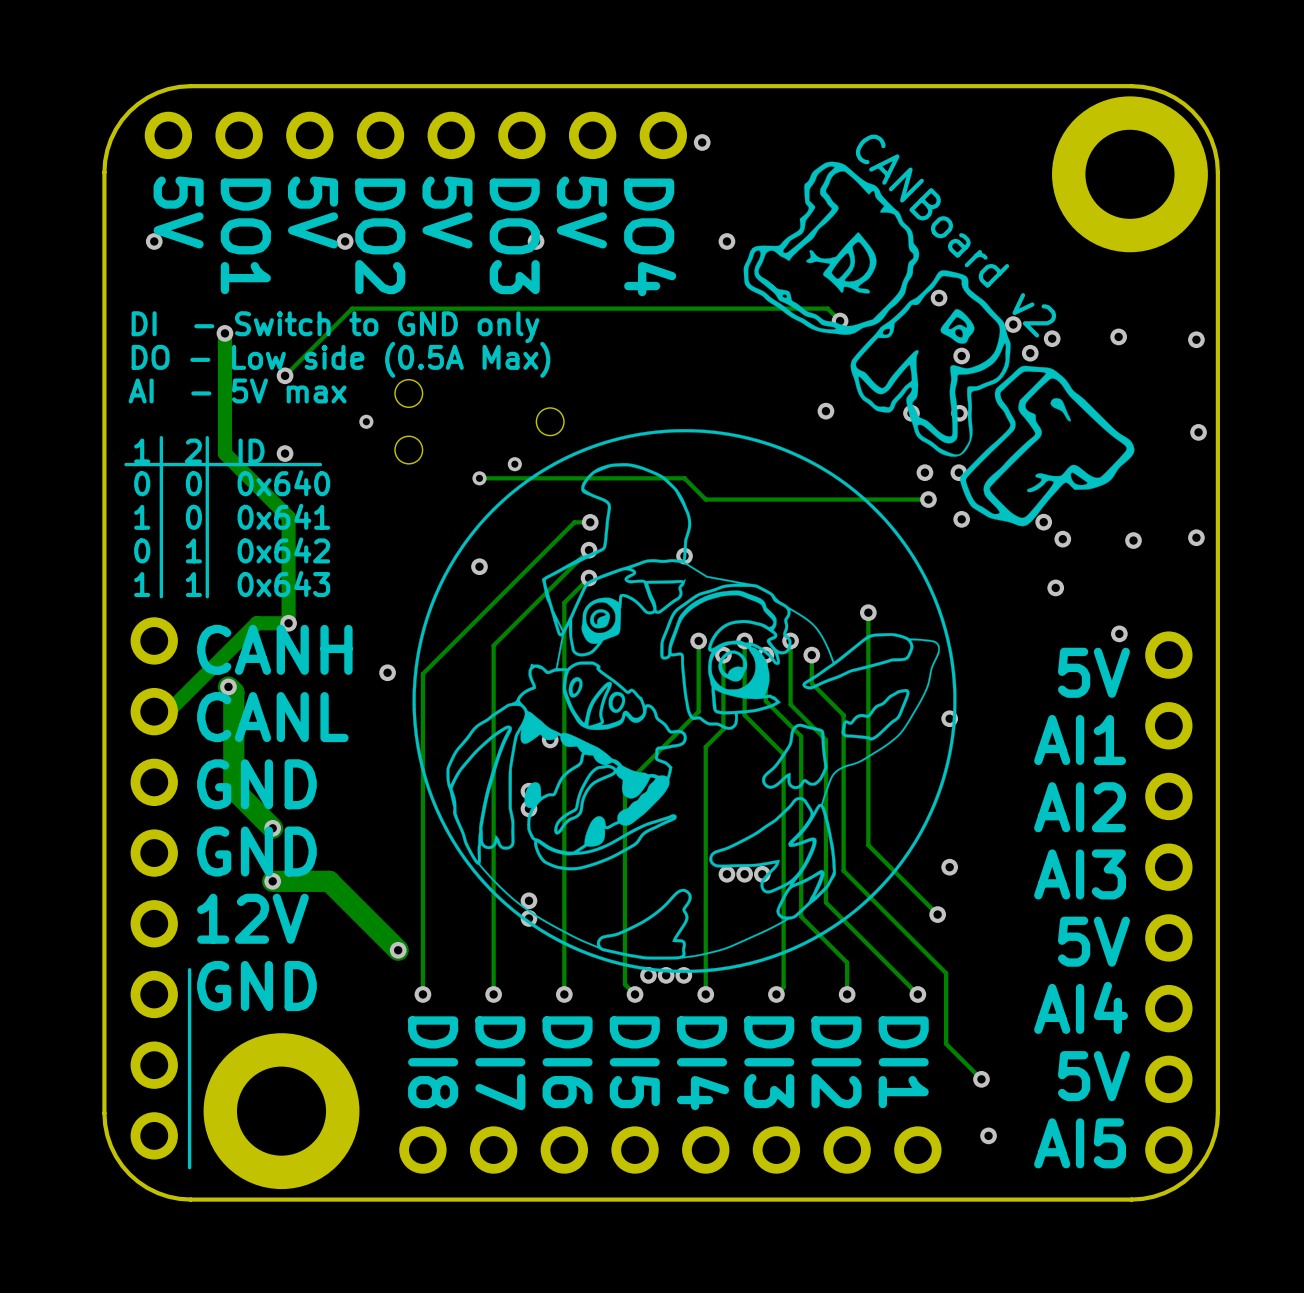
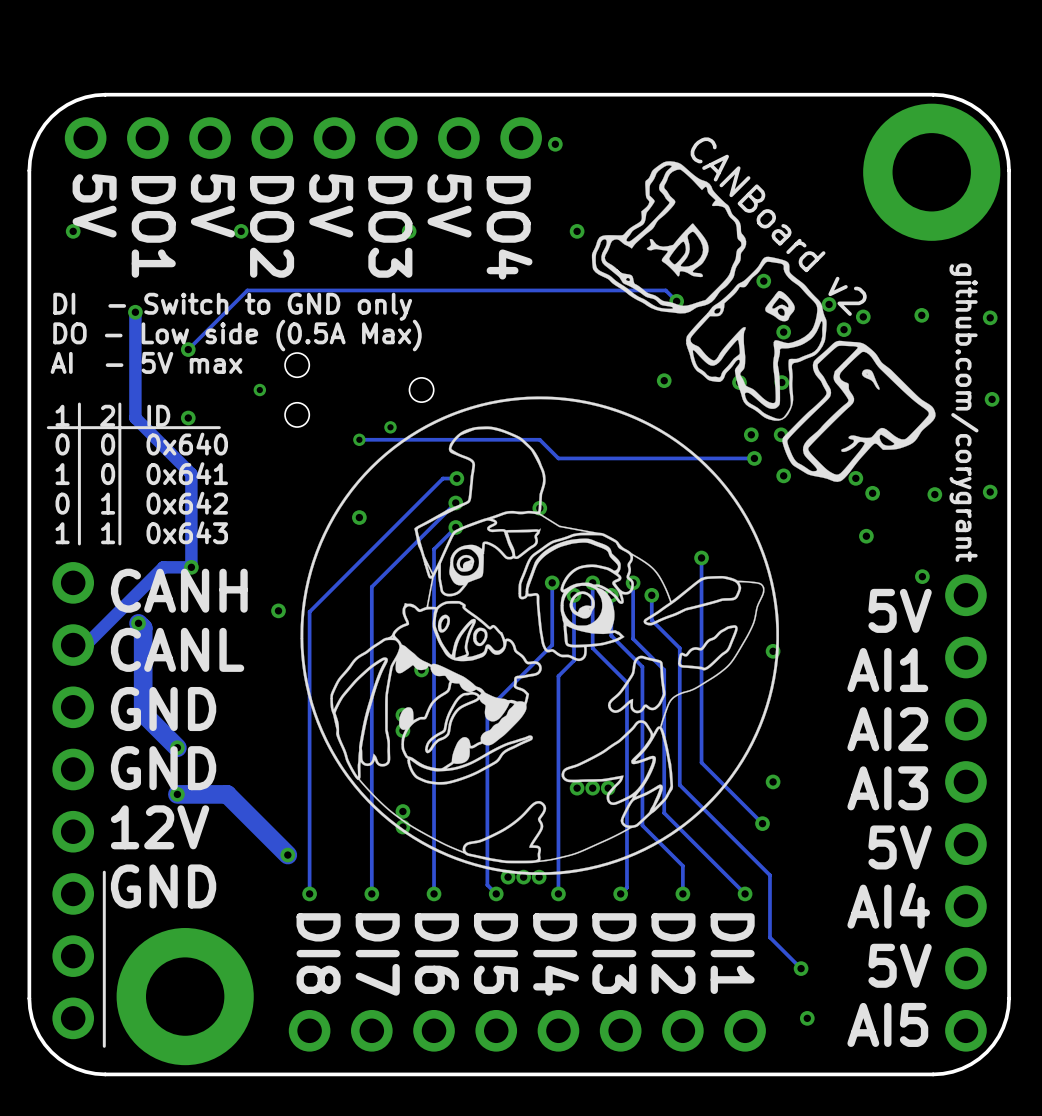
text: none -> github.com/corygrant (964, 412)

